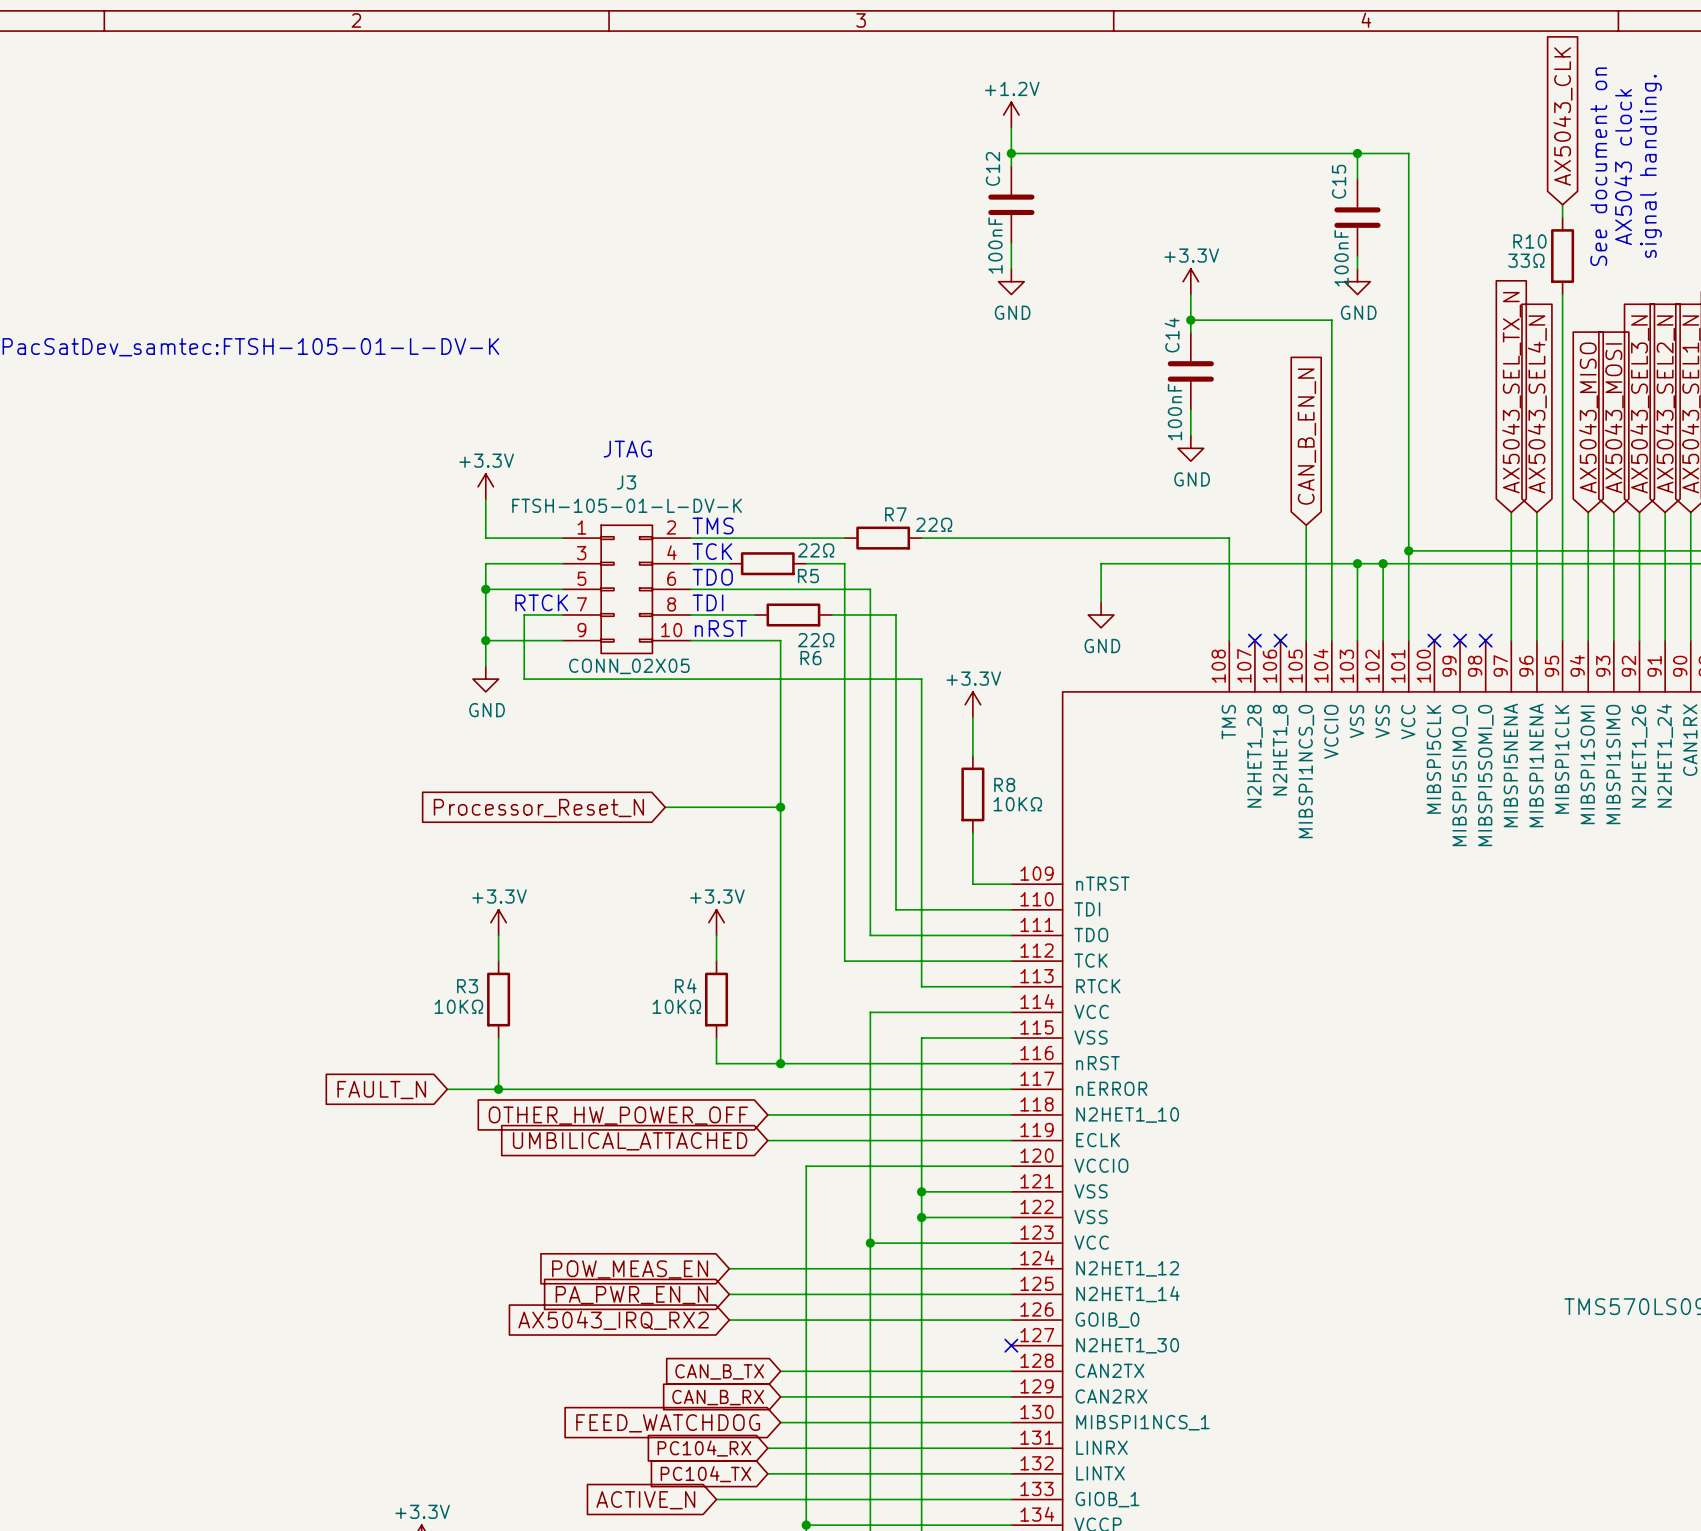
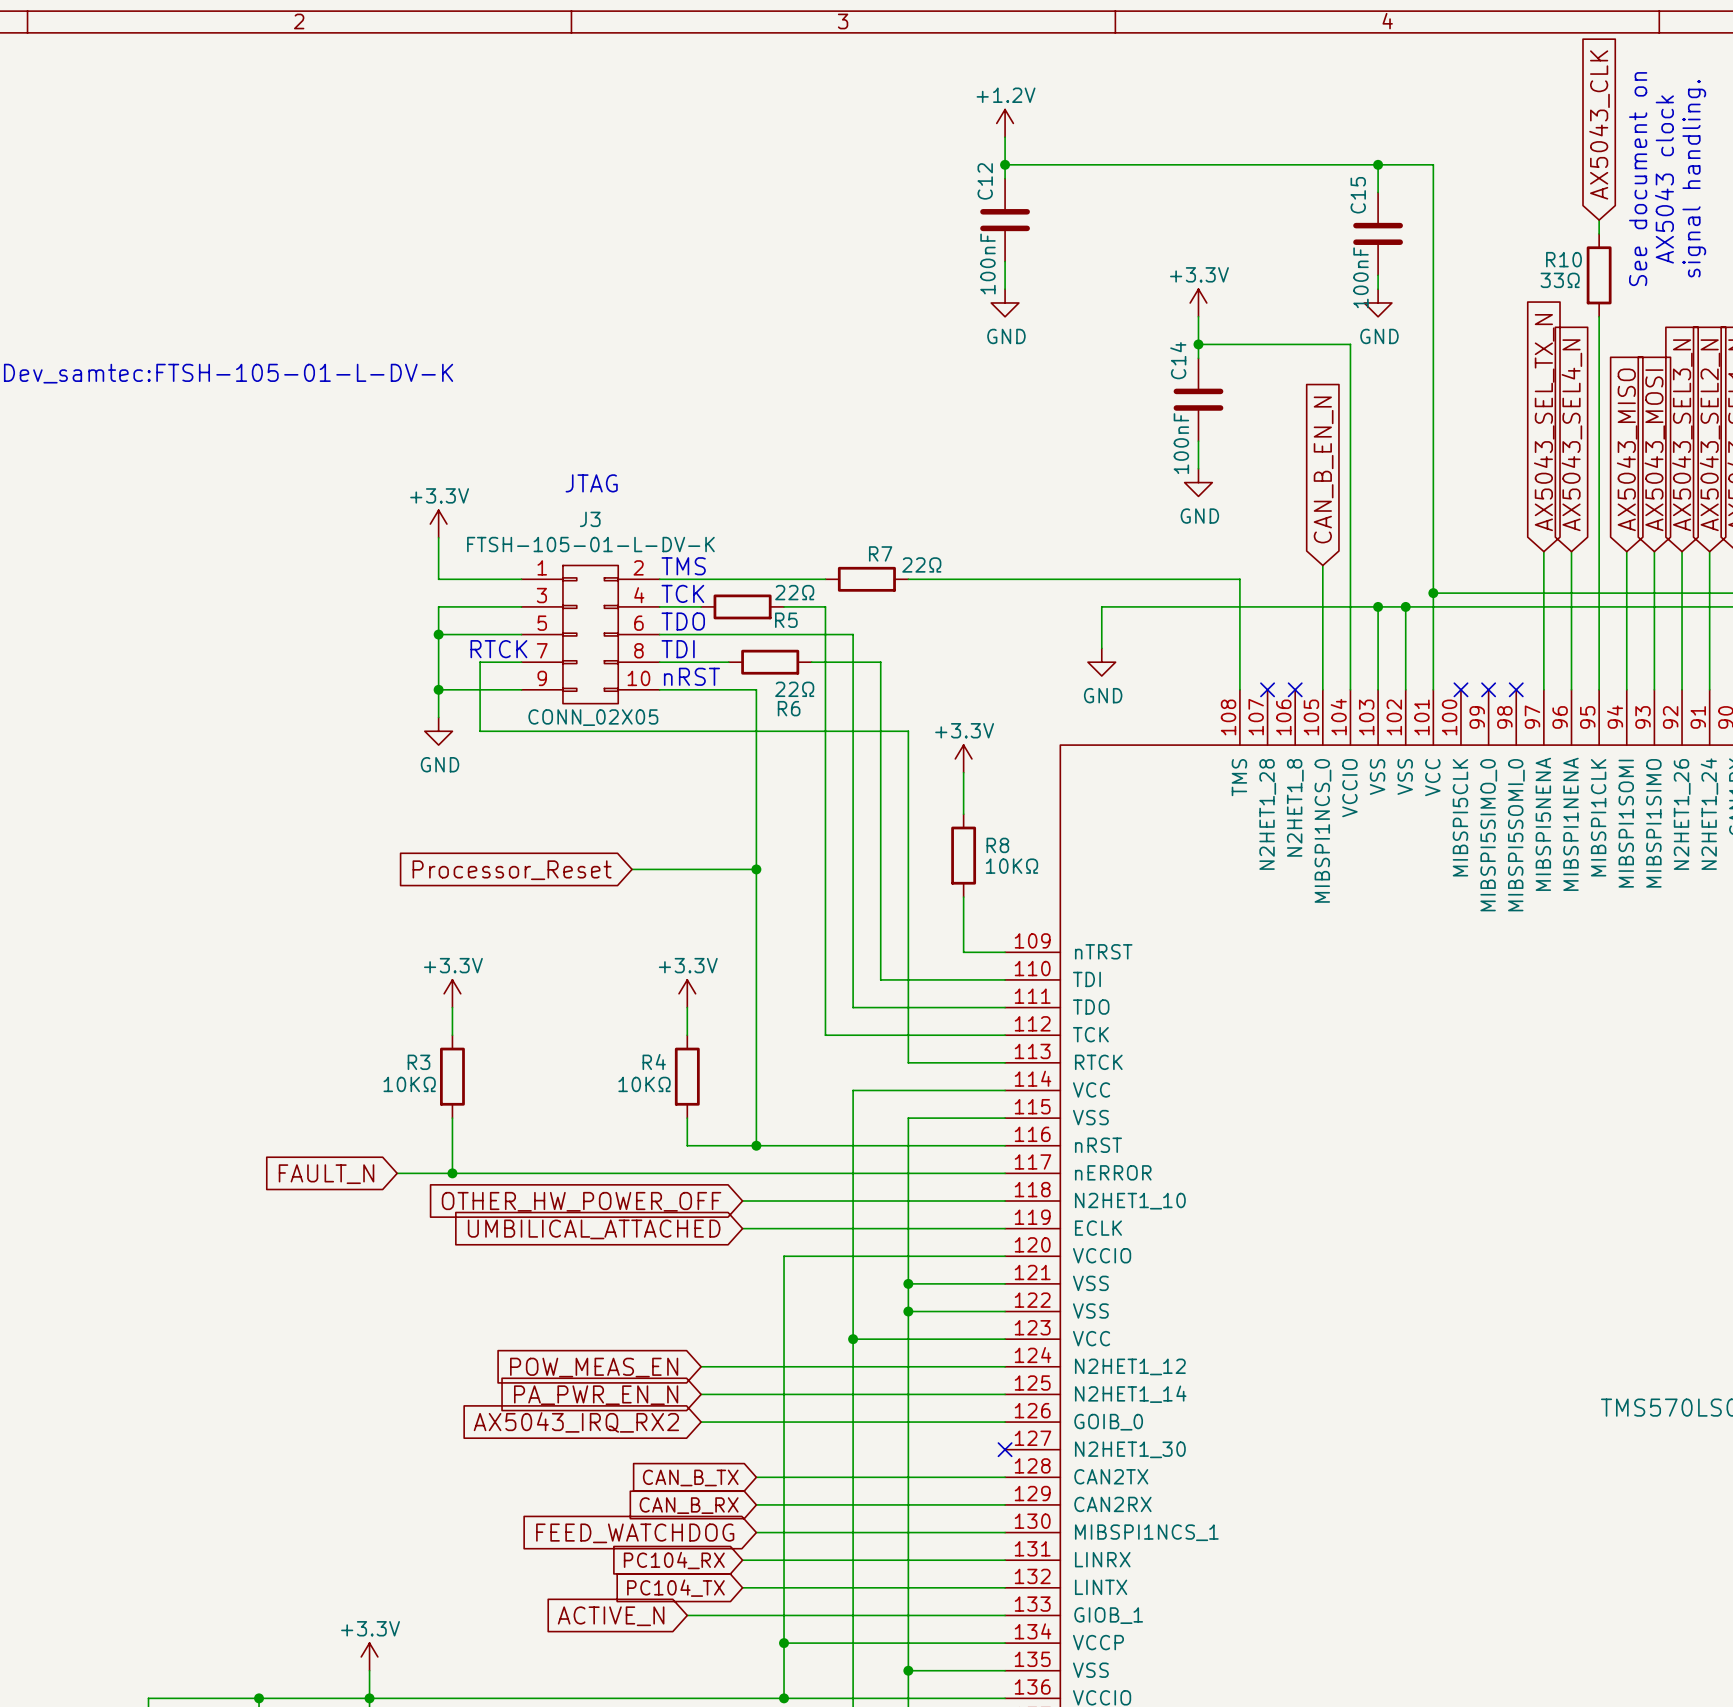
global label: Processor_Reset_N (538, 808) -> Processor_Reset (512, 870)

